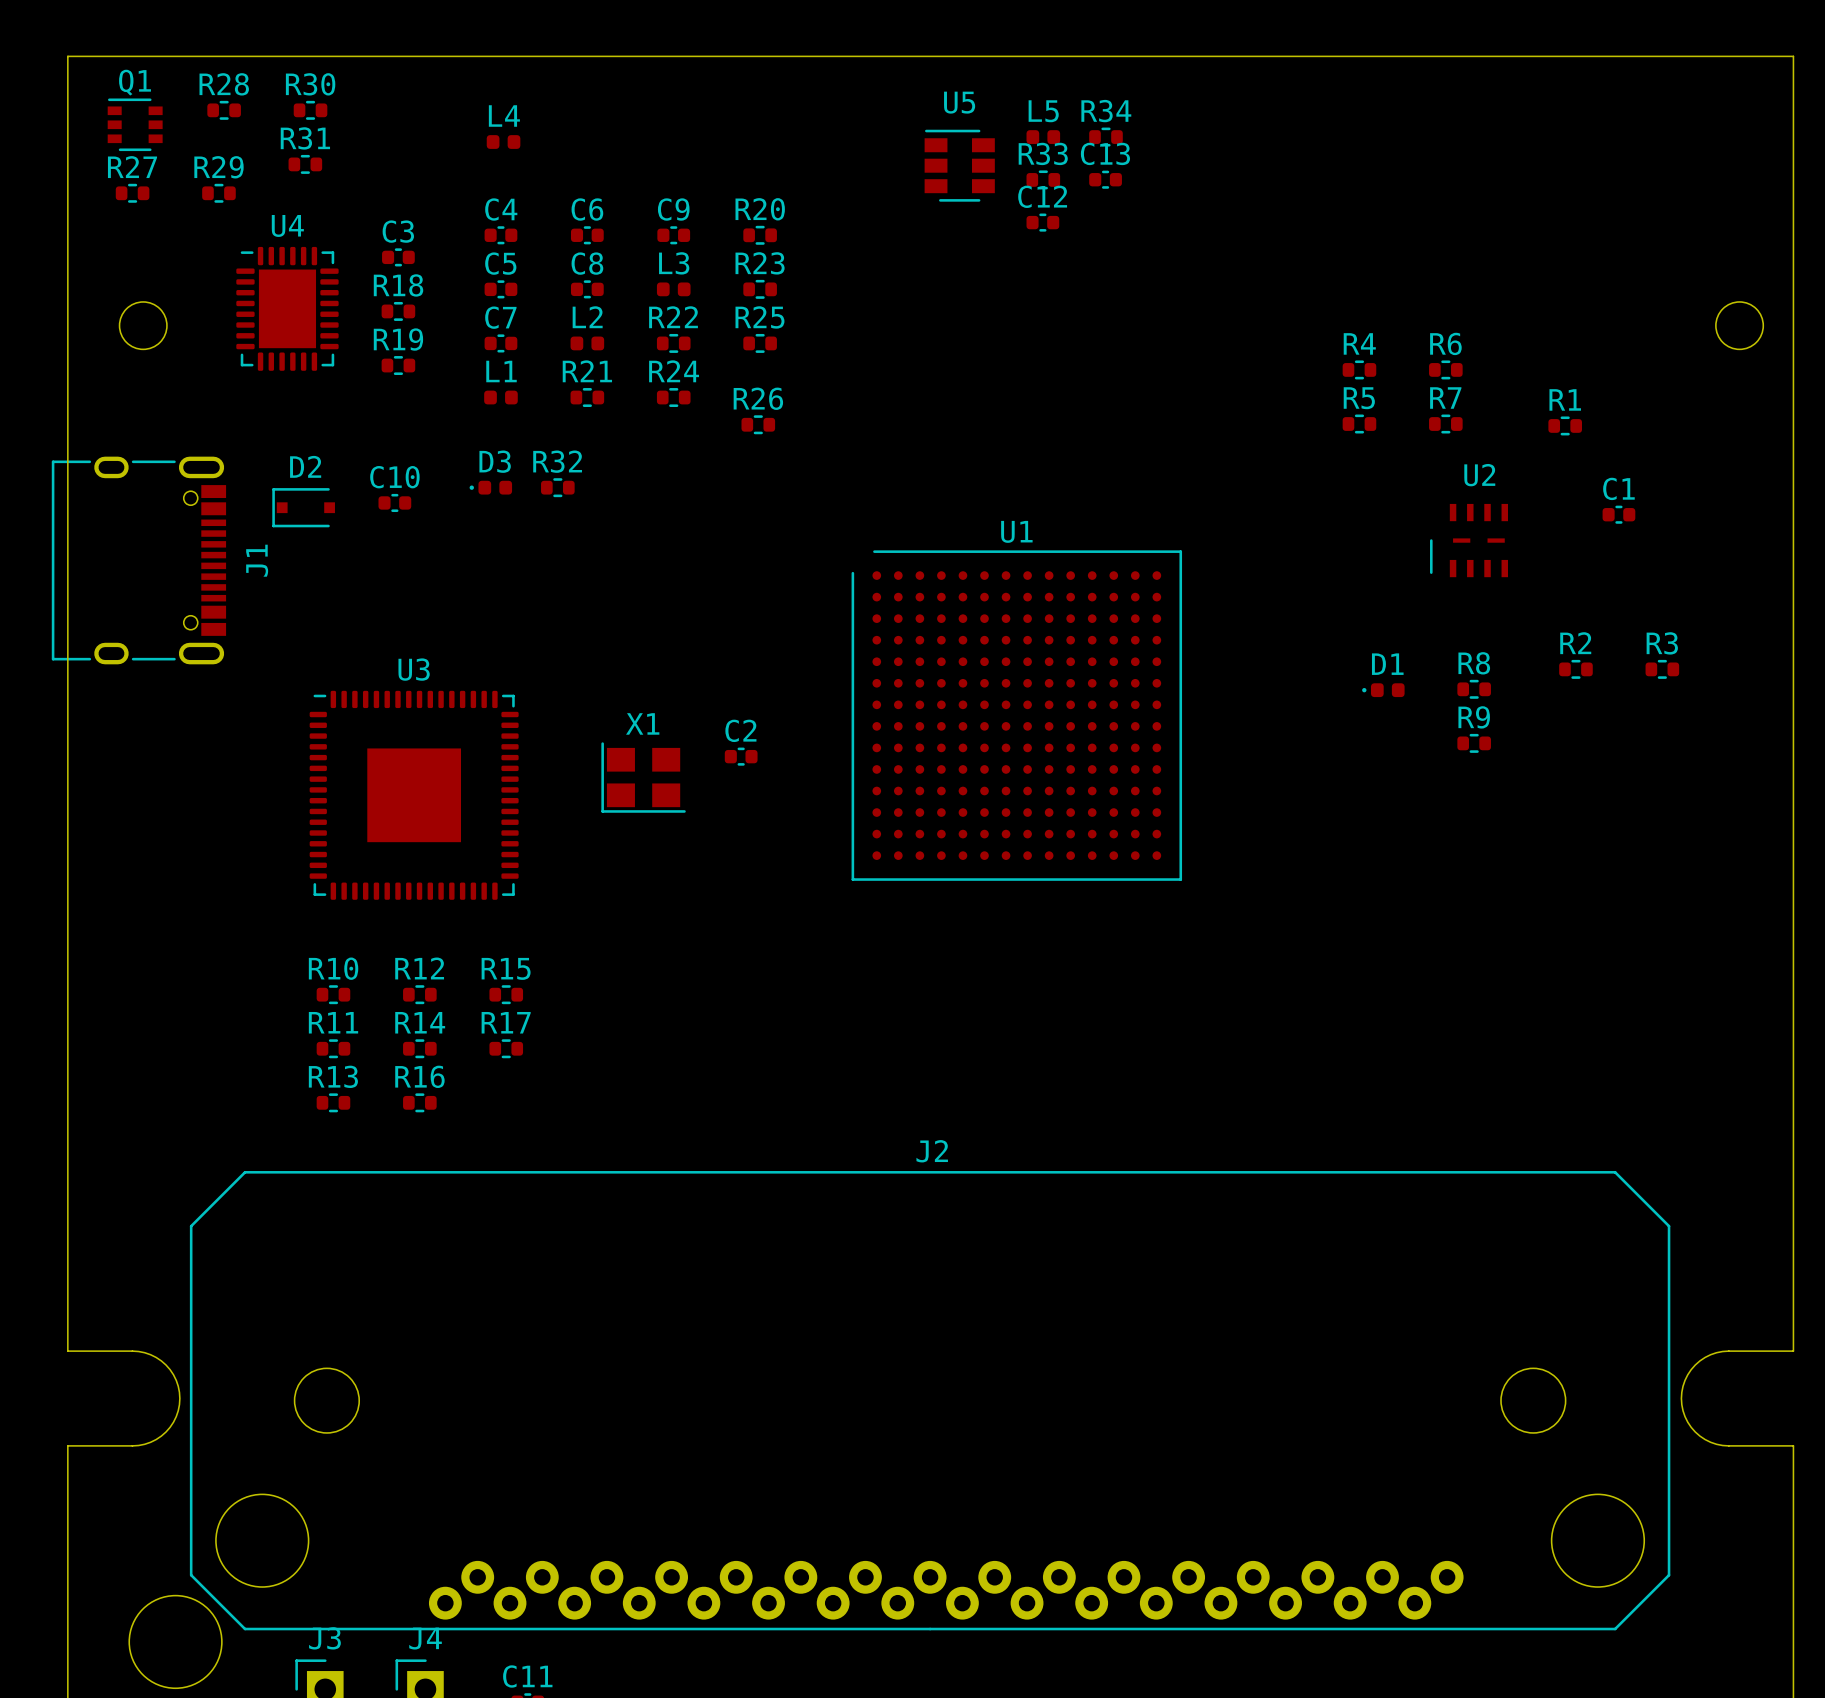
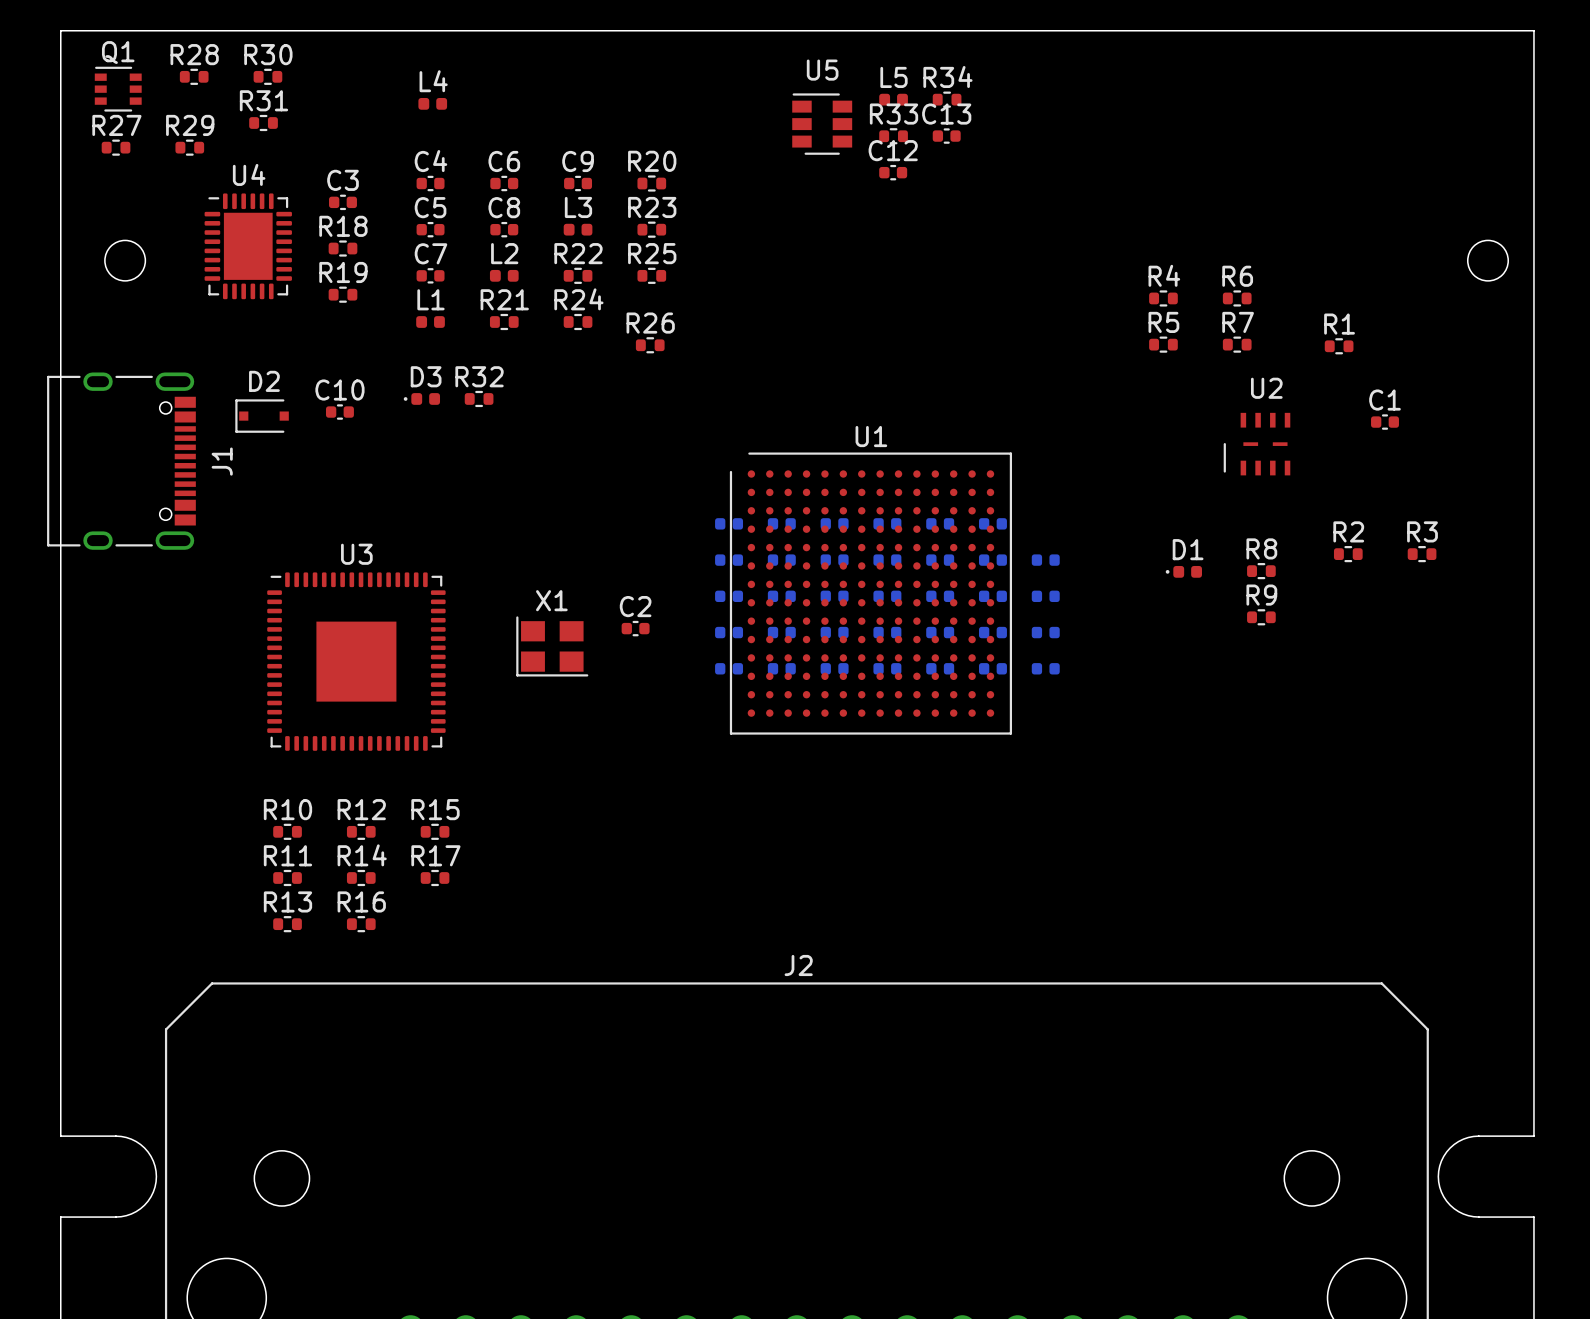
part: none -> (729, 523)
part: none -> (781, 523)
part: none -> (834, 523)
part: none -> (887, 523)
part: none -> (940, 523)
part: none -> (992, 523)
part: none -> (729, 560)
part: none -> (781, 560)
part: none -> (834, 560)
part: none -> (887, 560)
part: none -> (940, 560)
part: none -> (992, 560)
part: none -> (1045, 560)
part: none -> (729, 596)
part: none -> (781, 596)
part: none -> (834, 596)
part: none -> (887, 596)
part: none -> (940, 596)
part: none -> (992, 596)
part: none -> (1045, 596)
part: none -> (729, 632)
part: none -> (781, 632)
part: none -> (834, 632)
part: none -> (887, 632)
part: none -> (940, 632)
part: none -> (992, 632)
part: none -> (1045, 632)
part: none -> (729, 668)
part: none -> (781, 668)
part: none -> (834, 668)
part: none -> (887, 668)
part: none -> (940, 668)
part: none -> (992, 668)
part: none -> (1045, 668)

